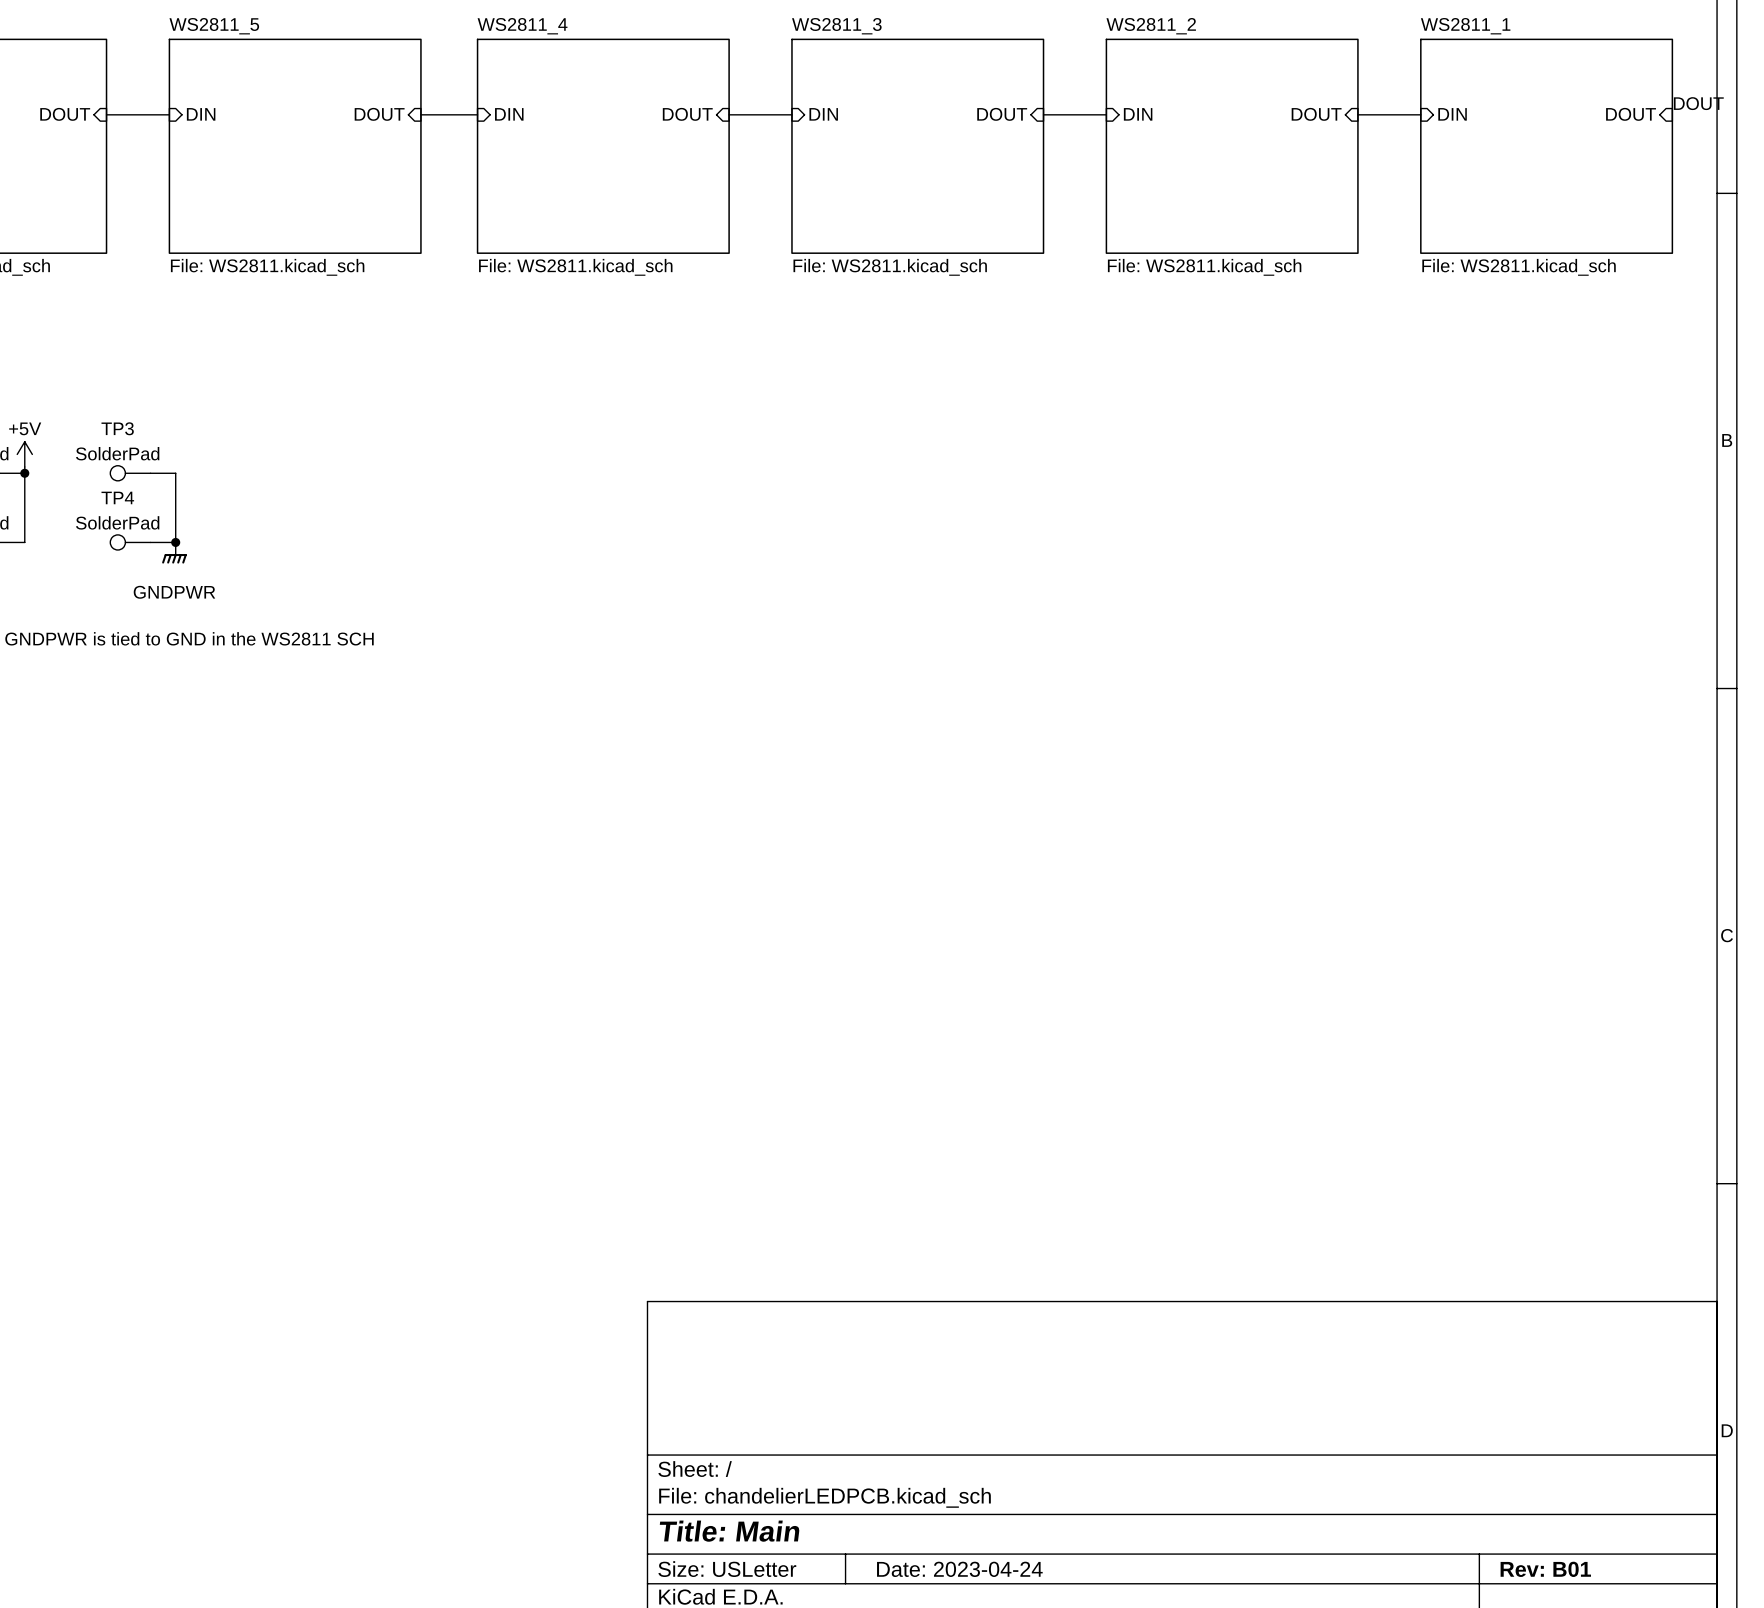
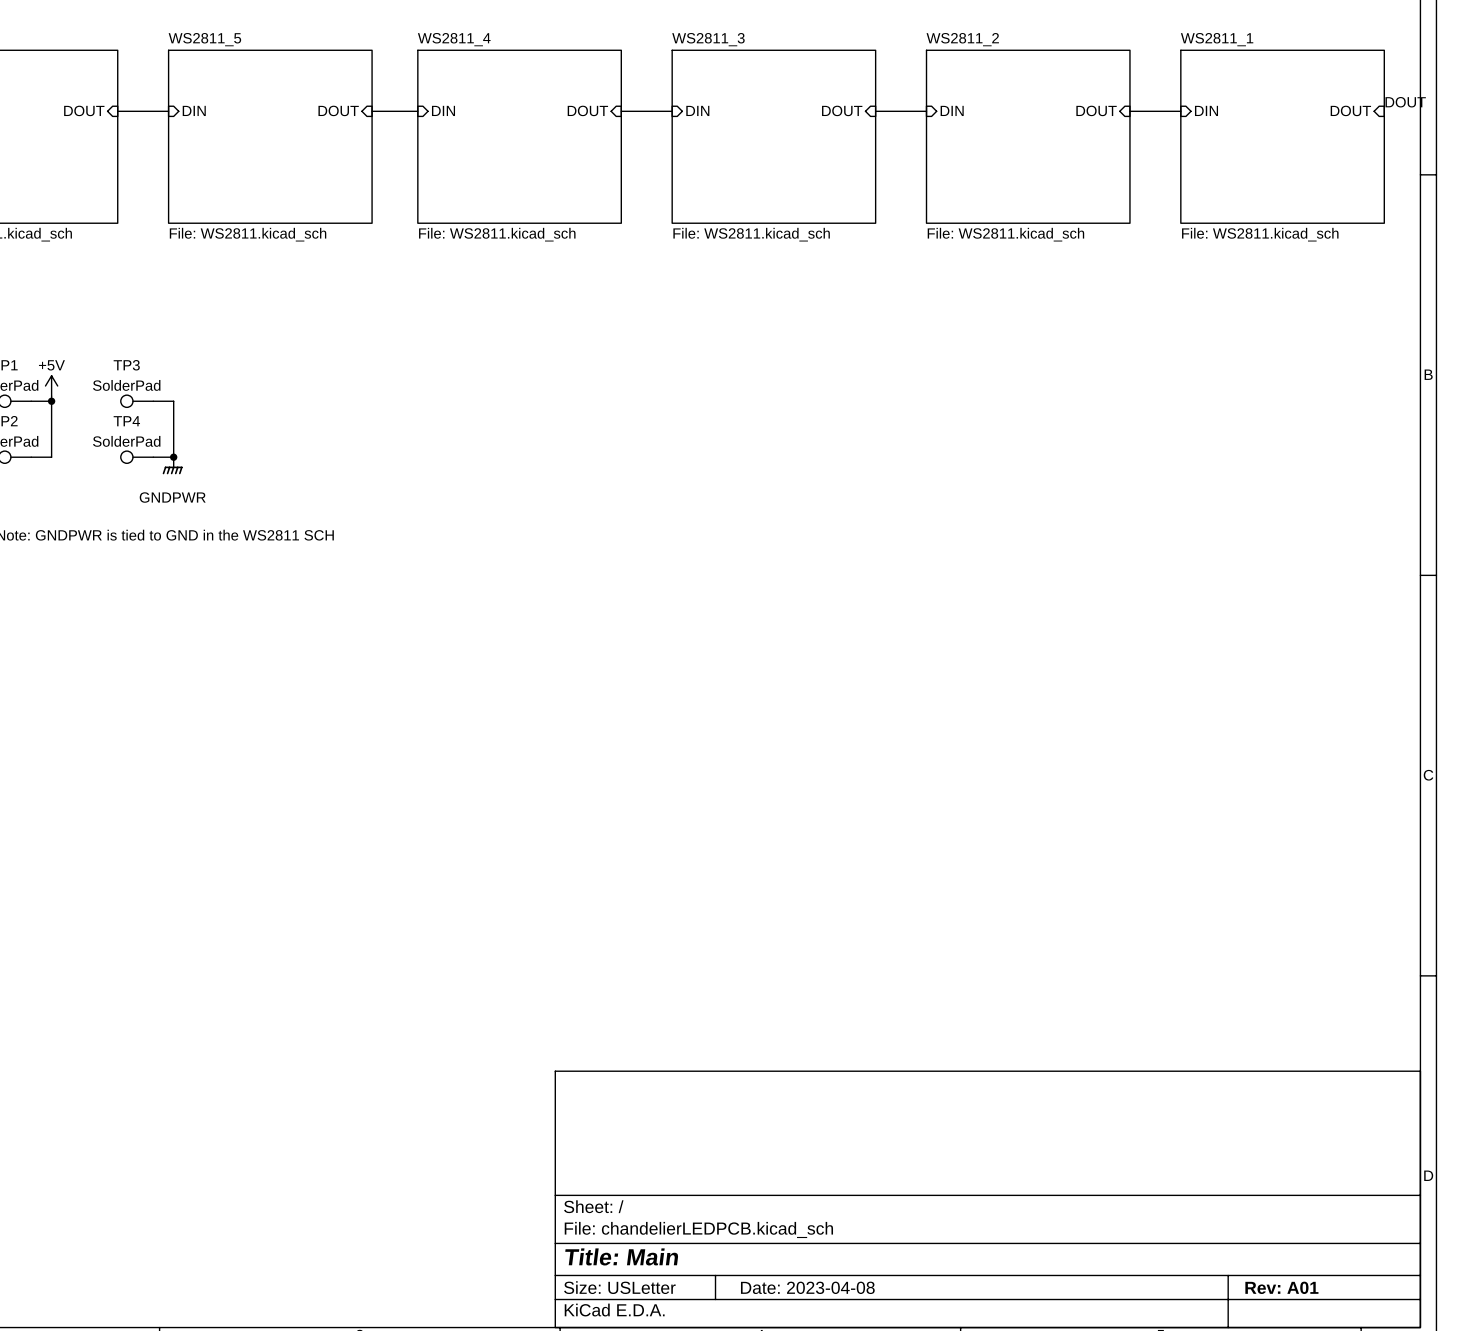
title block: Date: 2023-04-24 (959, 1569) -> Date: 2023-04-08 (807, 1287)
title block: Rev: B01 (1545, 1569) -> Rev: A01 (1281, 1287)

